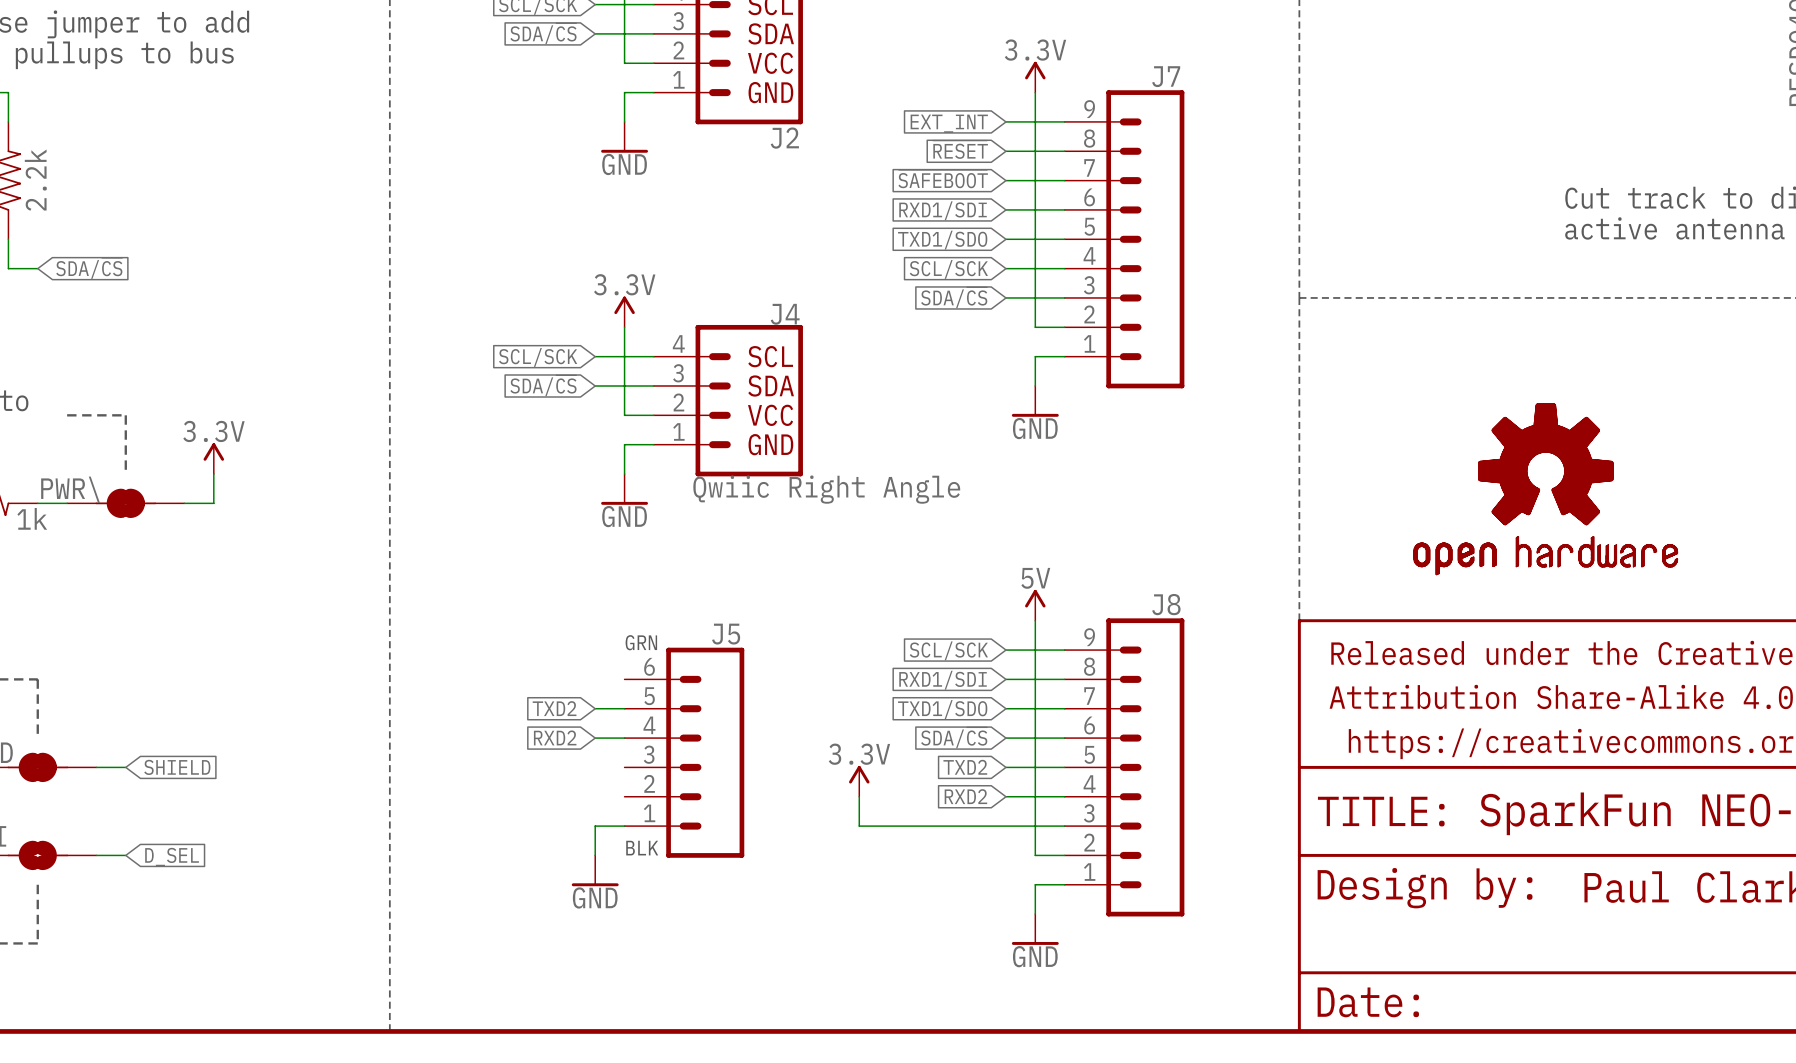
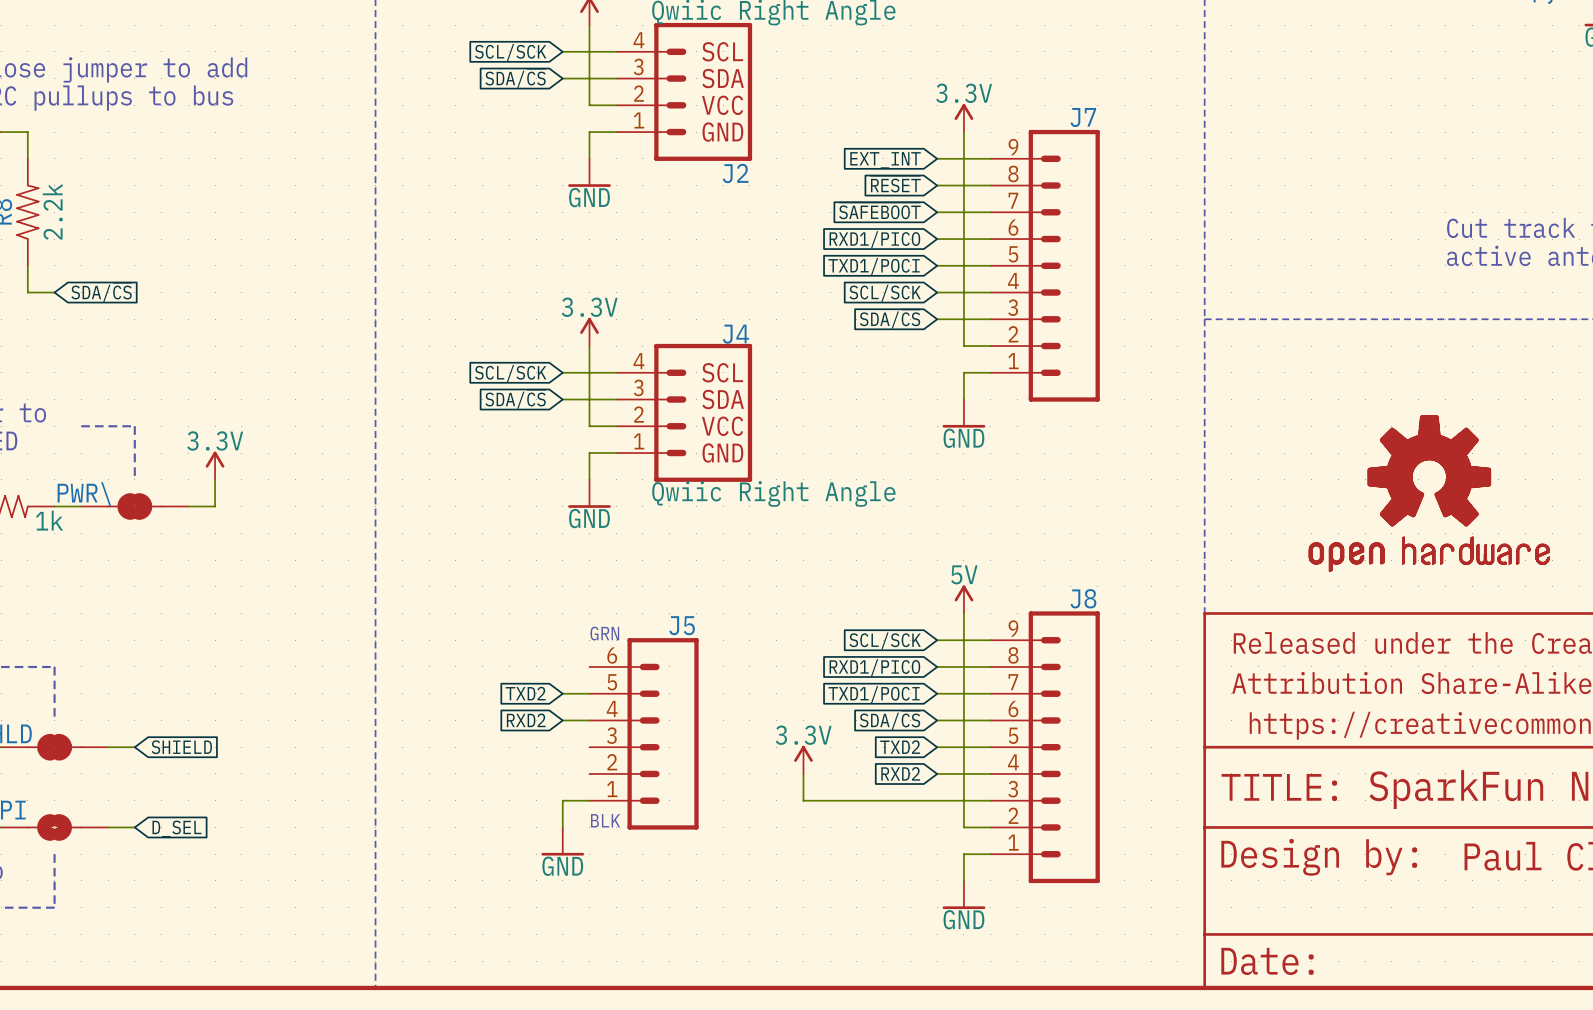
global label: RXD1/SDI (943, 210) -> RXD1/PICO (874, 239)
global label: TXD1/SDO (942, 240) -> TXD1/POCI (874, 266)
global label: RXD1/SDI (943, 680) -> RXD1/PICO (874, 667)
global label: TXD1/SDO (942, 709) -> TXD1/POCI (874, 694)

